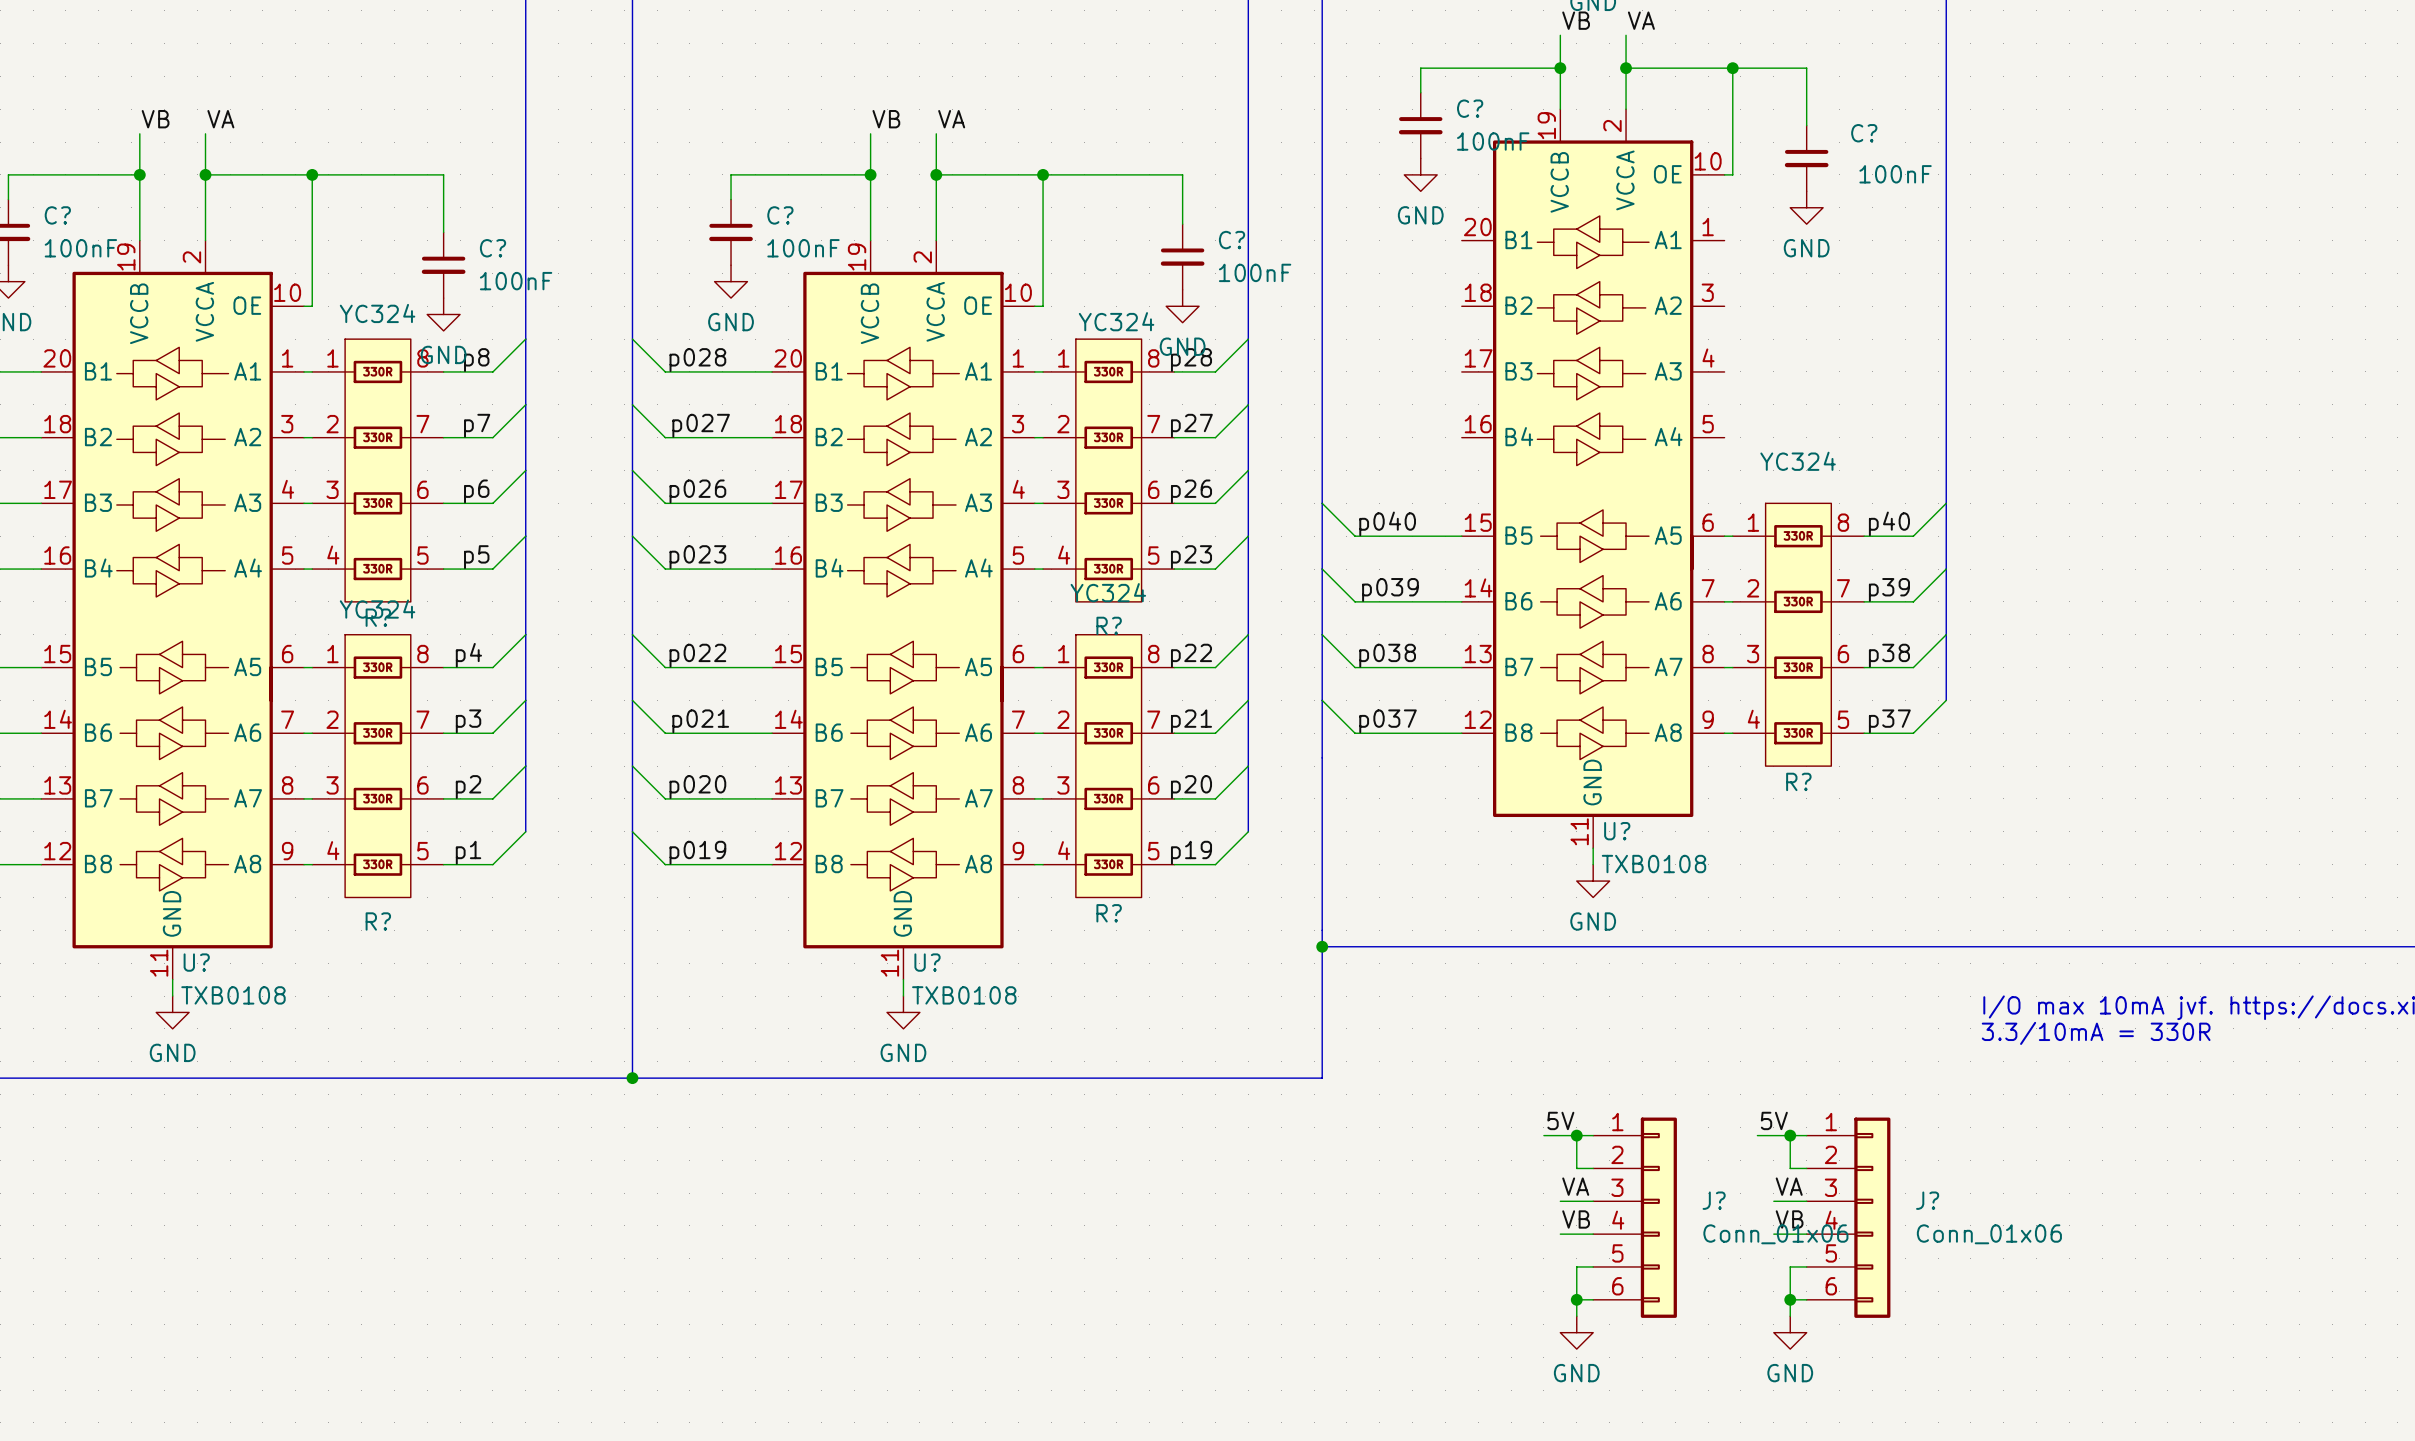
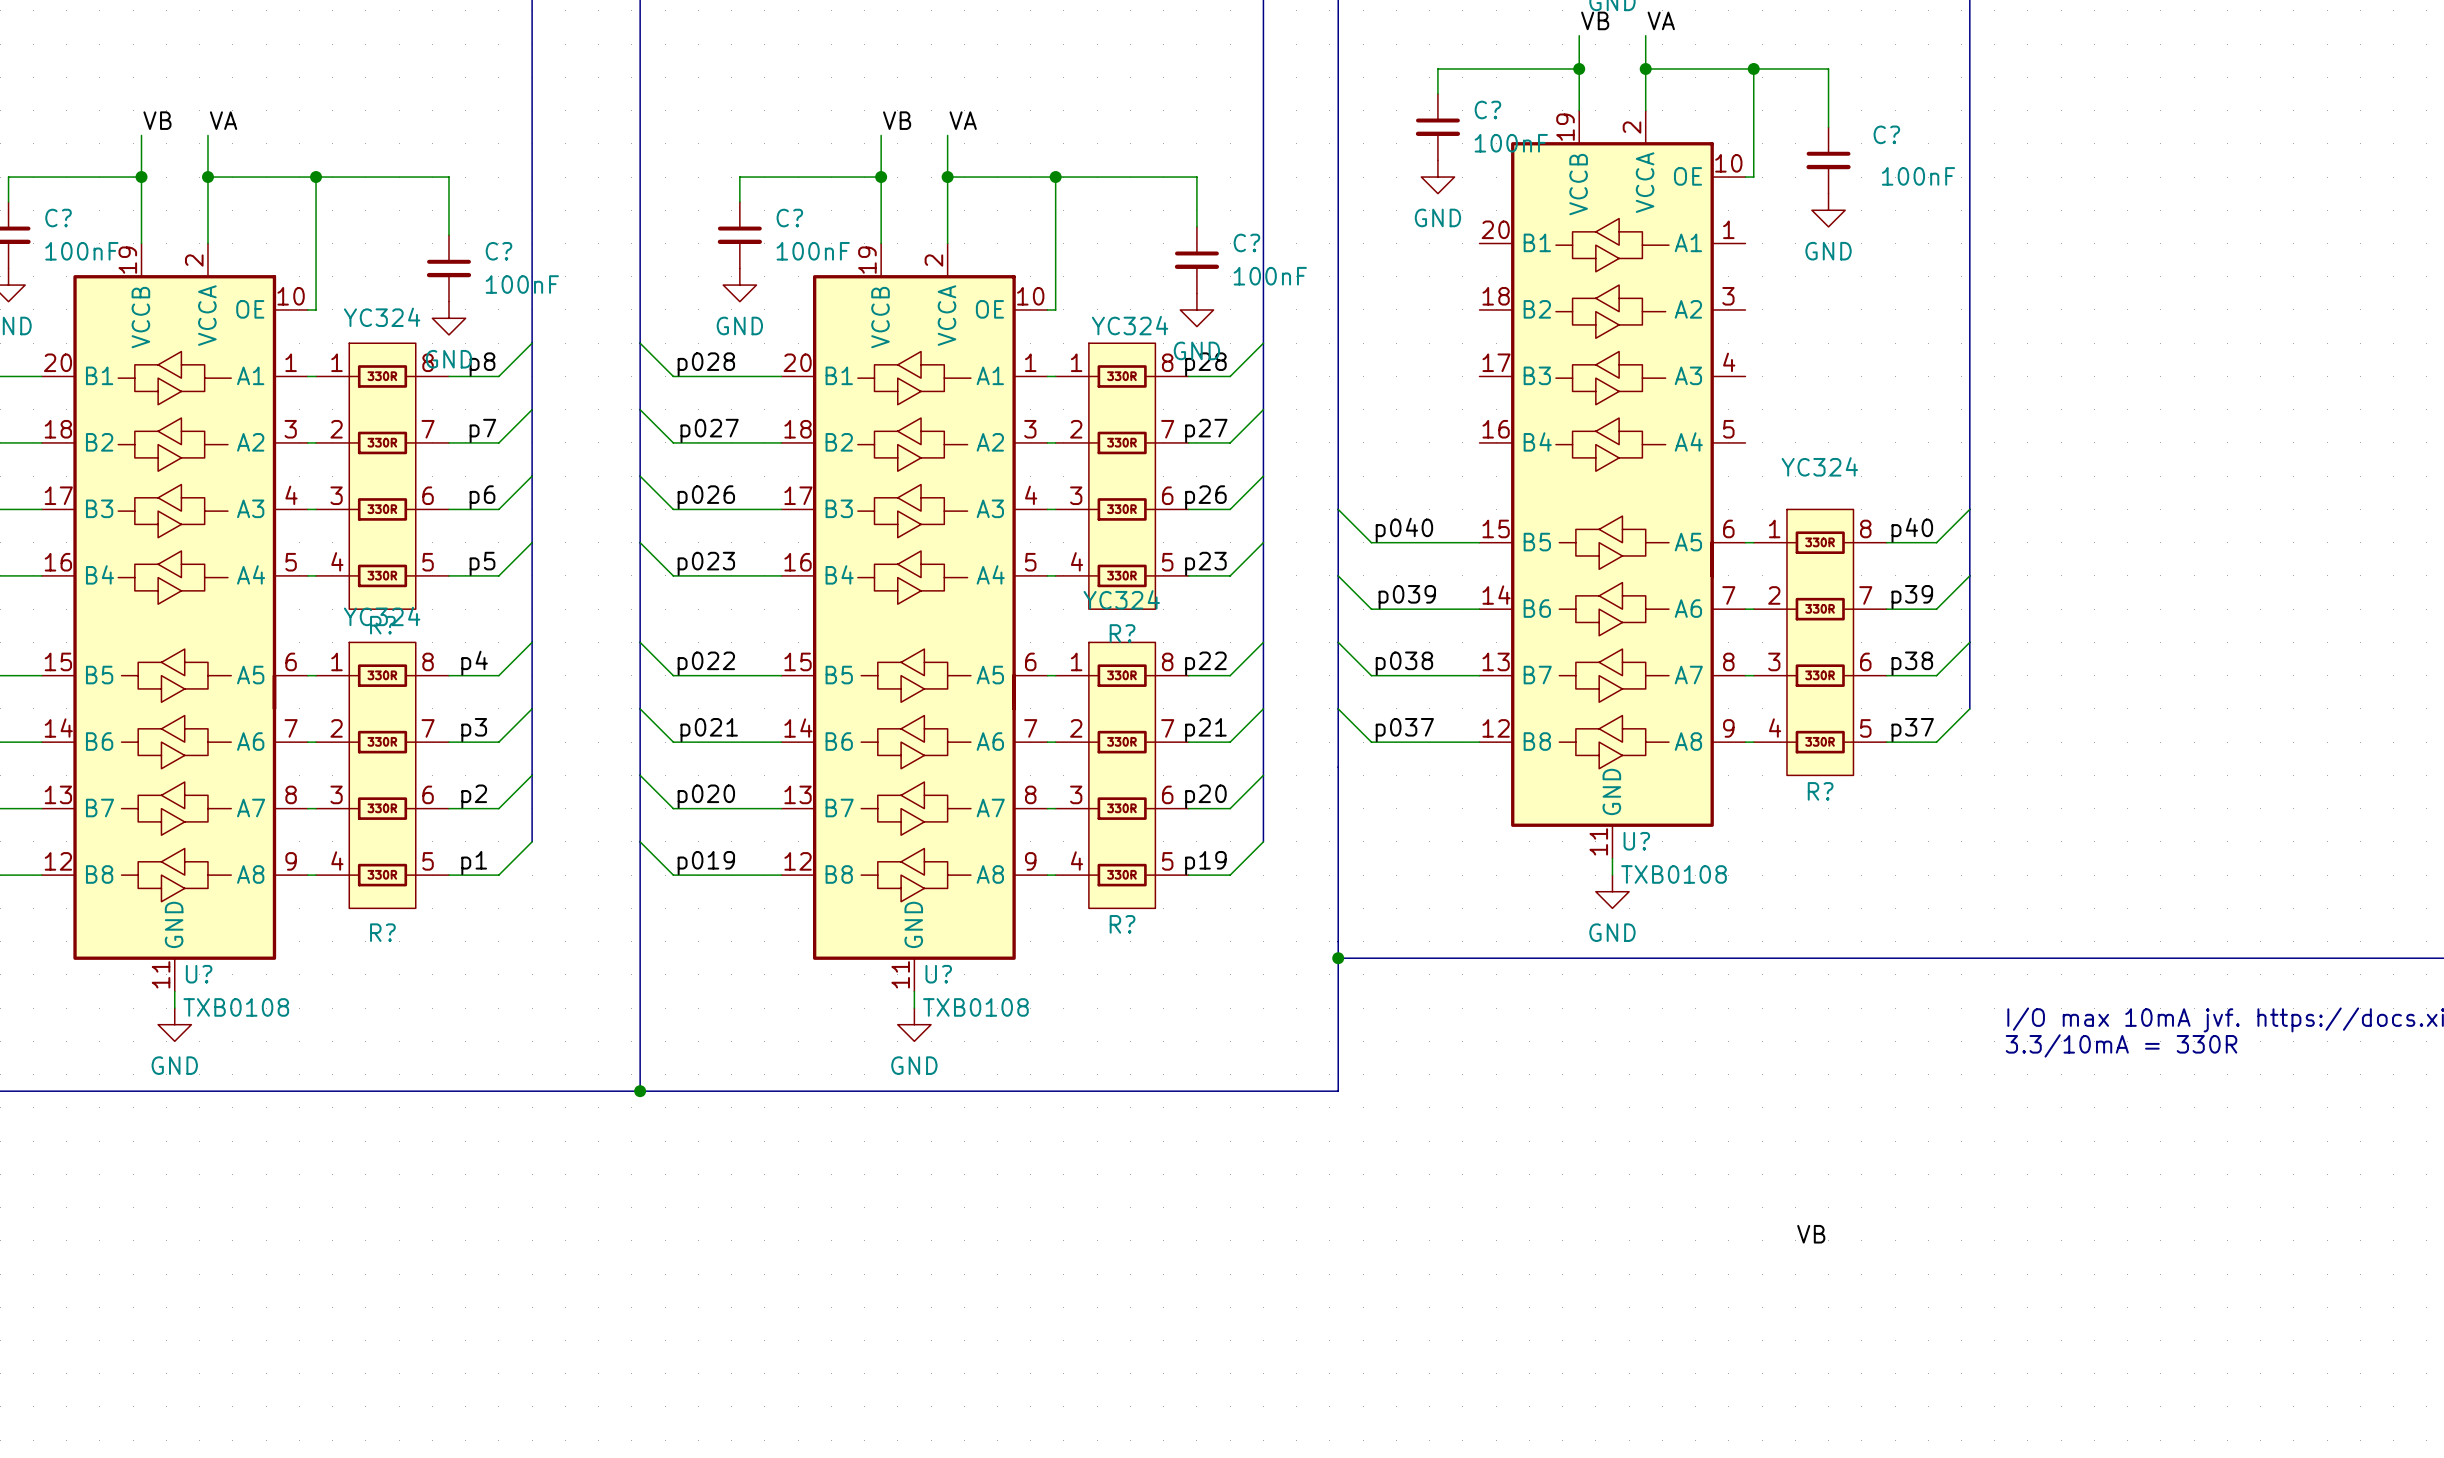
label: 5V (1560, 1120) -> none
label: 5V (1774, 1120) -> none
wire: (1543, 1135) (1593, 1135) -> none
wire: (1576, 1135) (1576, 1168) (1593, 1168) -> none
junction: (1576, 1135) -> none
wire: (1757, 1135) (1806, 1135) -> none
wire: (1790, 1135) (1790, 1168) (1806, 1168) -> none
junction: (1790, 1135) -> none
label: VA (1575, 1186) -> none
label: VA (1789, 1186) -> none
wire: (1560, 1201) (1593, 1201) -> none
wire: (1773, 1201) (1806, 1201) -> none
J?: Conn_01x06 (1635, 1217) -> none
J?: Conn_01x06 (1848, 1217) -> none
label: VB (1576, 1219) -> none
wire: (1560, 1234) (1593, 1234) -> none
wire: (1773, 1234) (1806, 1234) -> none
wire: (1593, 1266) (1576, 1266) (1576, 1316) -> none
wire: (1806, 1266) (1790, 1266) (1790, 1316) -> none
wire: (1576, 1299) (1593, 1299) -> none
junction: (1576, 1299) -> none
wire: (1790, 1299) (1806, 1299) -> none
junction: (1790, 1299) -> none
power symbol: GND (1576, 1332) -> none
power symbol: GND (1790, 1332) -> none

